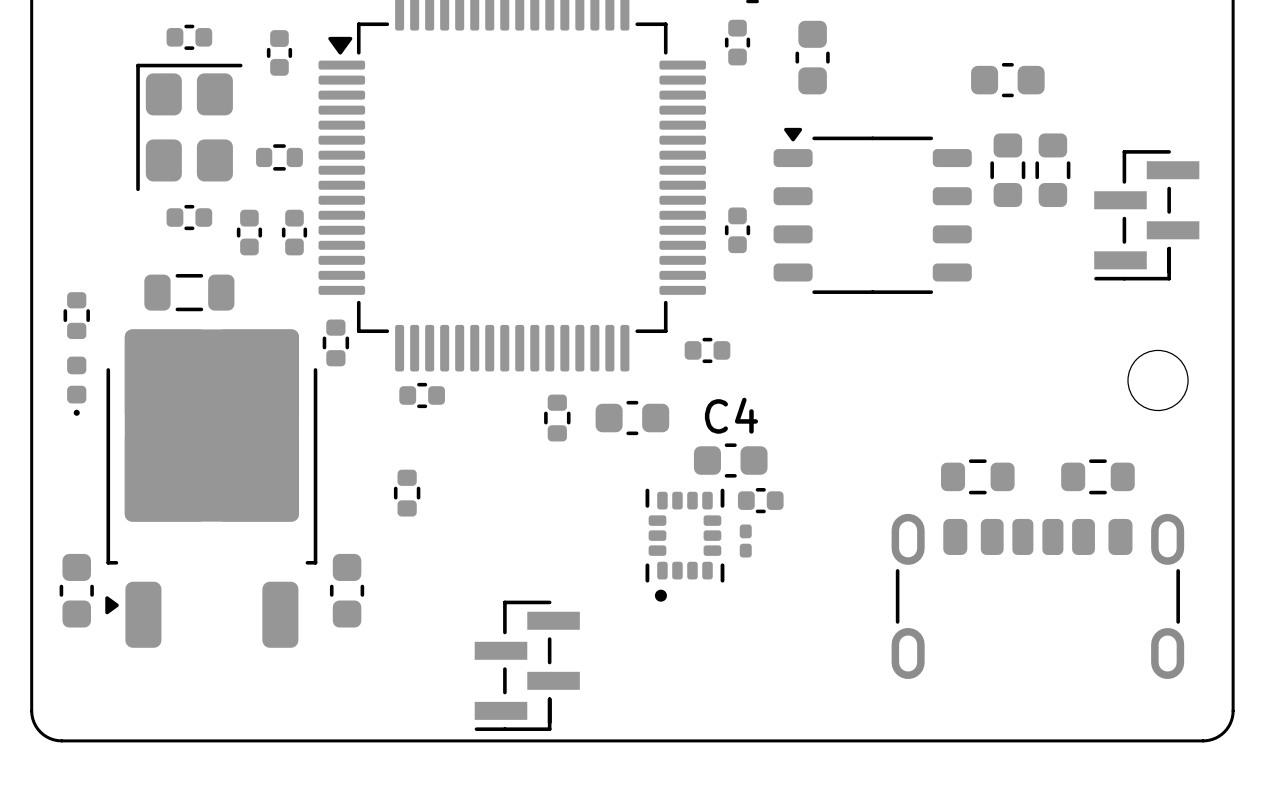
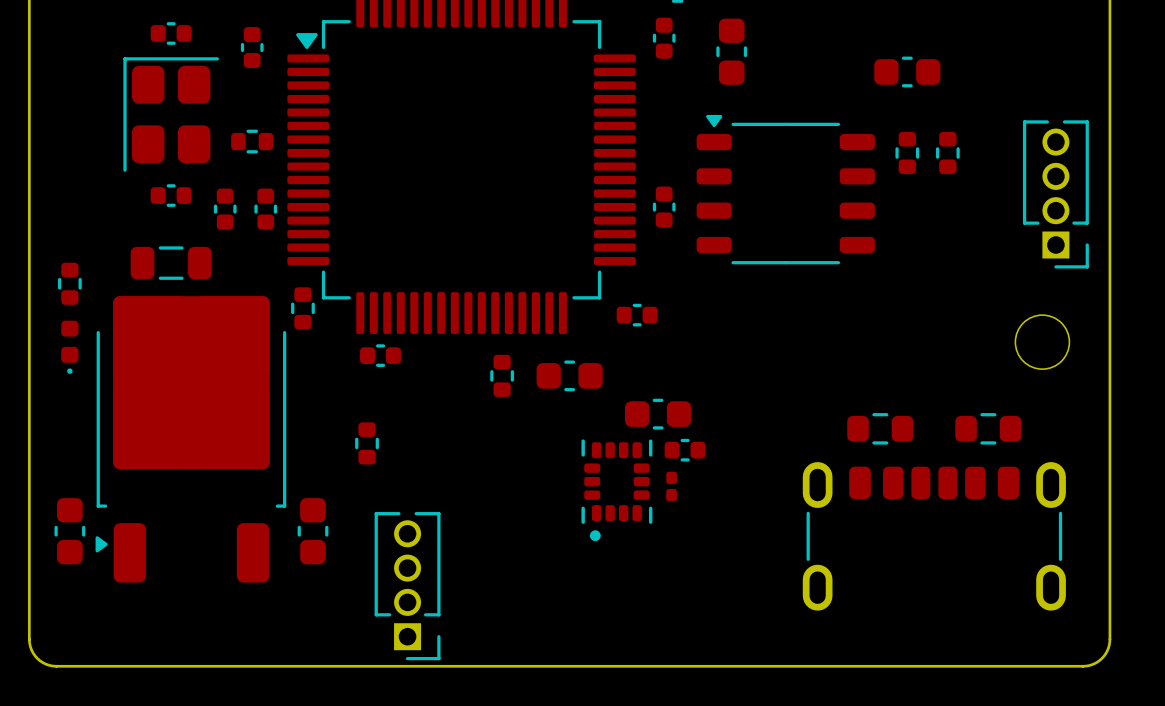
part footprint: [990, 133, 1026, 208] -> [895, 131, 920, 175]
part footprint: [1035, 133, 1071, 208] -> [935, 131, 960, 175]
part footprint: [1094, 150, 1200, 281] -> [1022, 120, 1089, 269]
C4 name: C4 (731, 415) -> none
part: none -> (407, 586)
part: (527, 665) -> none

